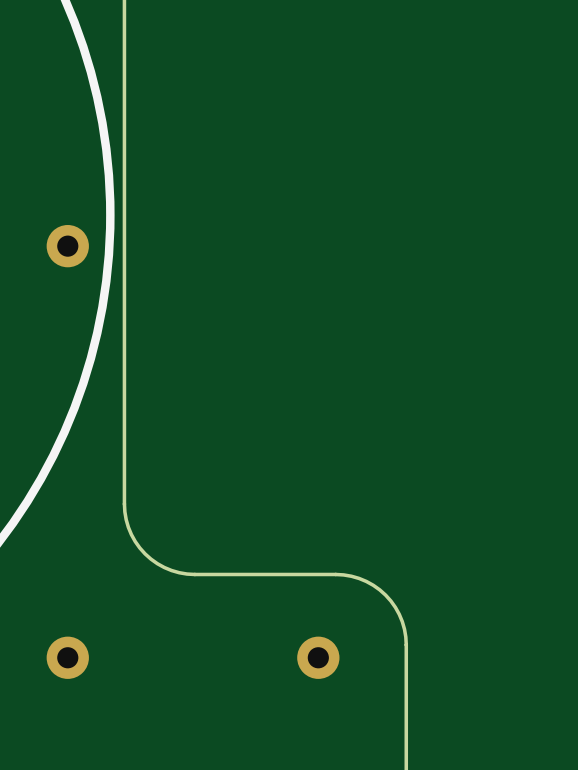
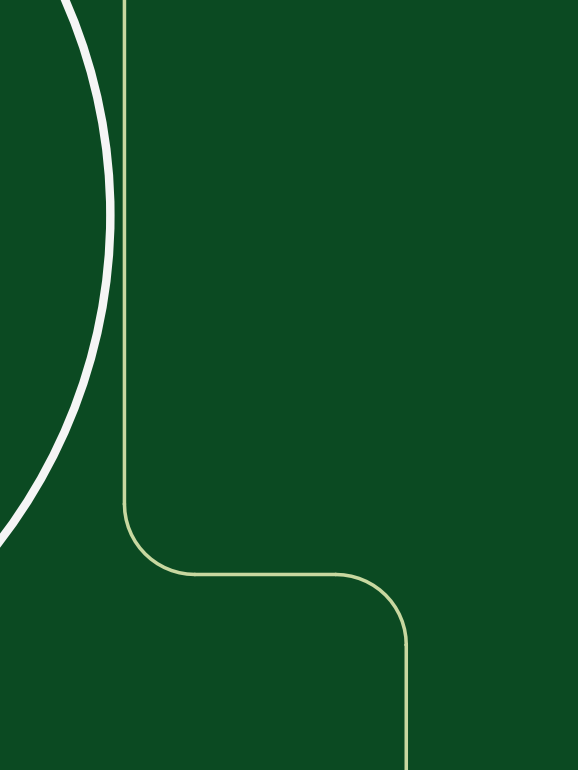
via: (67, 246) -> none
via: (67, 657) -> none
via: (318, 657) -> none

